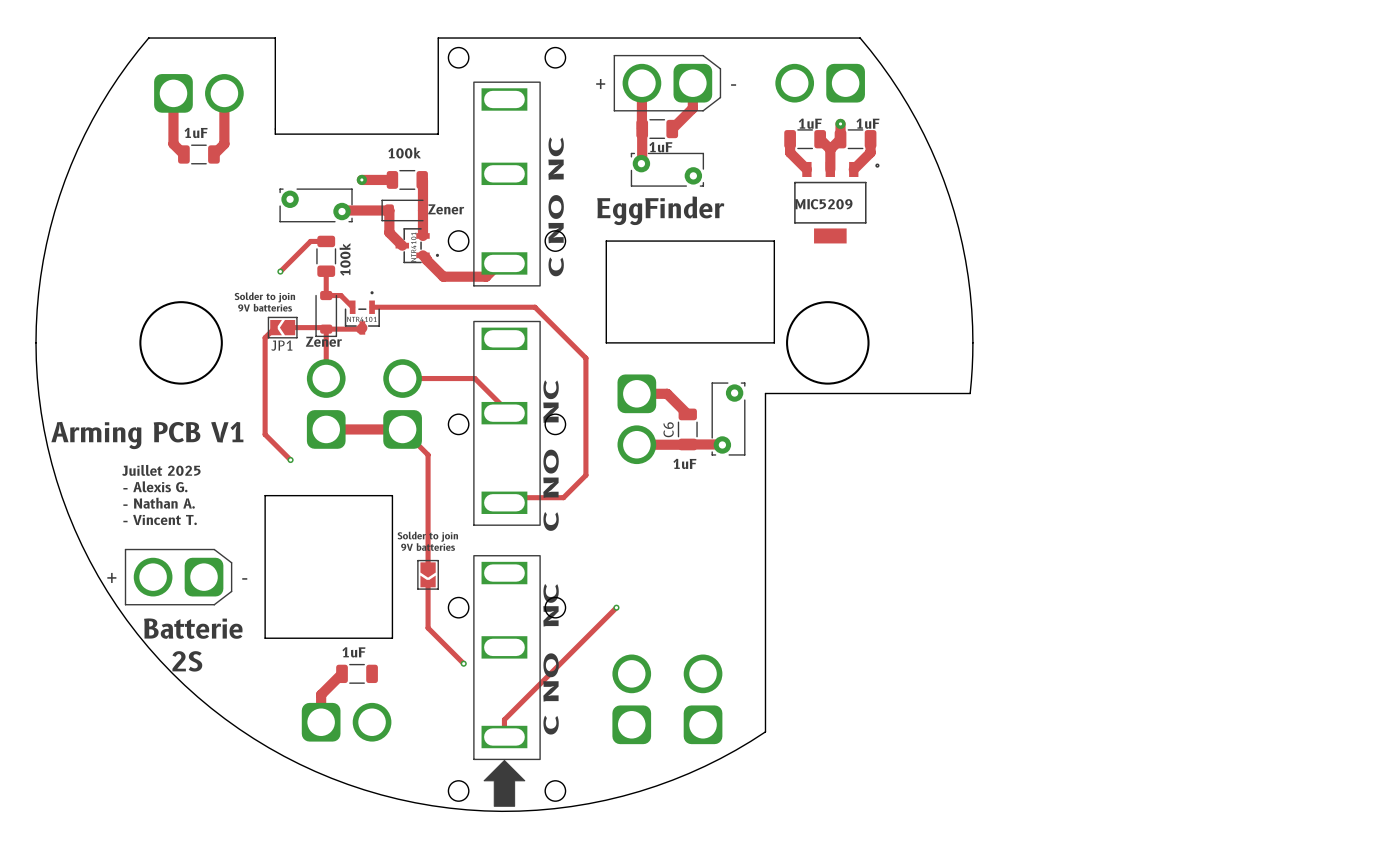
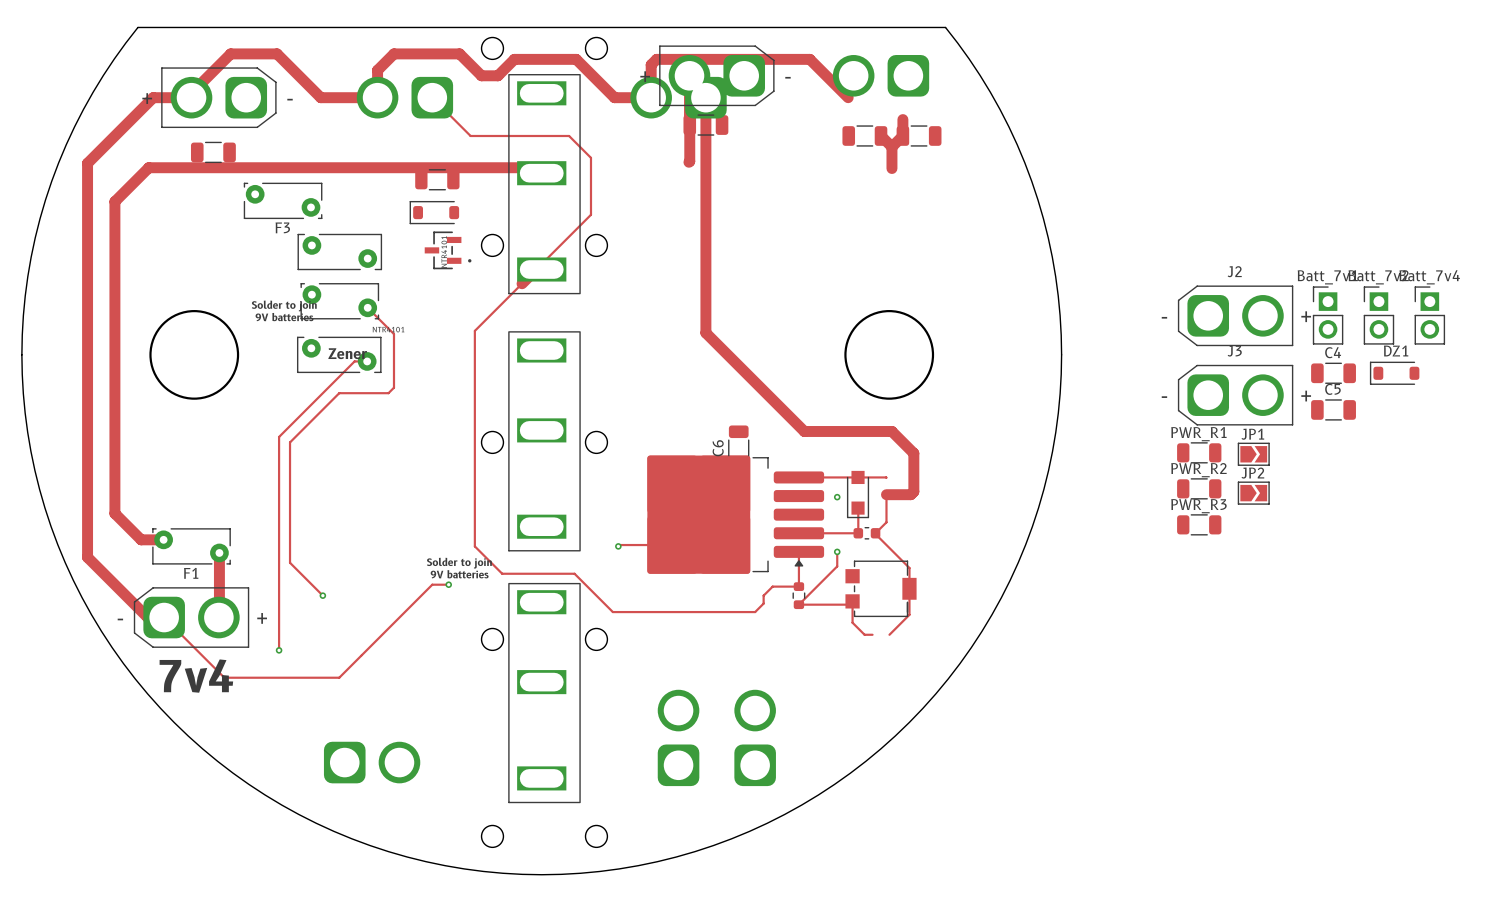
board edge: (148, 38) (275, 38) (275, 134) (438, 134) (438, 38) (860, 38) (890, 77) (916, 119) (937, 164) (954, 211) (965, 260) (971, 309) (972, 355) (970, 393) (765, 393) (765, 731) (720, 758) (688, 773) (656, 786) (605, 800) (554, 808) (519, 811) (449, 808) (415, 802) (364, 789) (331, 778) (284, 756) (239, 729) (211, 708) (184, 685) (148, 647) (116, 605) (98, 576) (82, 545) (62, 497) (47, 446) (41, 412) (35, 342) (37, 309) (43, 260) (54, 211) (65, 180) (84, 134) (100, 105) (118, 77) (148, 38) -> (137, 27) (103, 75) (83, 109) (66, 144) (45, 199) (31, 257) (25, 295) (21, 354) (25, 413) (30, 451) (44, 508) (65, 562) (82, 597) (112, 647) (135, 679) (174, 722) (217, 761) (265, 795) (298, 814) (351, 838) (407, 857) (445, 865) (502, 873) (541, 874) (599, 871) (638, 865) (694, 851) (749, 831) (801, 805) (850, 773) (880, 748) (922, 708) (948, 679) (991, 614) (1018, 562) (1032, 526) (1052, 451) (1060, 393) (1061, 354) (1058, 295) (1052, 257) (1031, 181) (999, 109) (980, 75) (945, 27) (137, 27)
track: (692, 83) (692, 108) (672, 129) -> none
part: (198, 93) -> none
track: (173, 103) (173, 144) (183, 154) -> none
part: none -> (218, 97)
track: (224, 103) (224, 144) (213, 154) -> none
part: none -> (404, 97)
track: none -> (432, 97) (470, 135) (569, 135) (590, 157) (590, 214) (541, 264)
part: none -> (678, 97)
track: none -> (705, 97) (705, 332) (804, 431) (891, 431) (913, 453) (913, 491) (910, 494) (886, 494)
track: none -> (848, 97) (809, 59) (656, 59) (651, 64) (651, 97) (614, 97) (576, 59) (514, 59) (497, 75) (481, 75) (459, 53) (393, 53) (377, 70) (377, 97) (320, 97) (277, 53) (230, 53) (191, 93) (191, 97) (153, 97) (87, 163) (87, 557) (147, 617) (164, 617) (224, 677) (339, 677) (432, 584) (448, 584)
text: 1uF (810, 123) -> none
via: (840, 123) -> none
text: 1uF (867, 123) -> none
text: 1uF (196, 132) -> none
track: (790, 139) (790, 152) (806, 169) -> none
track: (870, 139) (870, 152) (853, 169) -> none
text: 1uF (660, 147) -> none
text: 100k (404, 152) -> none
track: none -> (541, 167) (148, 167) (114, 201) (114, 513) (141, 539) (163, 539)
part: (667, 169) -> none
track: (361, 179) (392, 179) -> none
via: (361, 179) -> none
track: (422, 179) (422, 235) -> none
F3: none -> (283, 200)
part: (836, 202) -> none
text: MIC5209 (823, 204) -> none
part position: (316, 205) -> (339, 301)
text: C NO NC (556, 206) -> none
text: Zener (446, 209) -> none
text: EggFinder (660, 210) -> none
track: (342, 211) (389, 210) (389, 232) (402, 245) -> none
track: (326, 241) (310, 241) (280, 271) -> none
board edge: (606, 241) (774, 241) (774, 342) (606, 342) (606, 241) -> none
part: none -> (339, 252)
track: (422, 255) (443, 276) (486, 276) -> (798, 551) (798, 586) (772, 586) (763, 595) (763, 603) (755, 612) (612, 612) (574, 573) (502, 573) (474, 546) (474, 330) (522, 283)
part: (326, 256) -> none
text: 100k (345, 259) -> none
via: (280, 271) -> none
track: (326, 271) (326, 295) (340, 295) (352, 307) -> none
track: none -> (367, 307) (393, 334) (393, 387) (388, 393) (339, 393) (290, 442) (290, 562) (322, 595)
J2: none -> (1235, 315)
Batt_7v1: none -> (1328, 315)
Batt_7v2: none -> (1378, 315)
Batt_7v4: none -> (1429, 315)
track: (372, 307) (535, 307) (585, 358) (585, 475) (563, 497) (504, 497) -> none
part: (362, 312) -> none
part: (326, 313) -> none
track: (275, 327) (265, 337) (265, 434) (290, 460) -> none
JP1 rotation: 0° (282, 327) -> 180° (1253, 454)
JP1 position: (282, 327) -> (1253, 454)
track: (290, 327) (326, 329) -> none
track: (362, 327) (326, 329) -> none
track: (326, 329) (326, 378) -> none
part: none -> (339, 354)
track: none -> (367, 361) (354, 361) (279, 436) (279, 650)
C4: none -> (1333, 373)
DZ1: none -> (1394, 373)
track: (402, 378) (474, 378) (504, 408) -> none
J3: none -> (1235, 395)
track: (636, 393) (667, 393) (687, 414) -> none
C5: none -> (1333, 409)
part: (326, 403) -> none
part: (402, 403) -> none
part: (636, 419) -> none
part: (728, 419) -> none
track: (326, 429) (402, 429) (428, 454) (428, 567) -> none
PWR_R1: none -> (1199, 452)
text: Arming PCB V1 (147, 435) -> none
track: (636, 444) (722, 444) -> none
text: C NO NC (551, 455) -> none
track: none -> (809, 477) (886, 477)
via: (290, 460) -> none
text: 1uF (684, 463) -> none
PWR_R2: none -> (1199, 488)
text: Juillet 2025 (161, 470) -> none
JP2: none -> (1253, 493)
part: none -> (858, 494)
track: none -> (886, 494) (886, 522) (875, 534) (909, 568) (909, 614) (889, 634)
via: none -> (837, 497)
track: none -> (858, 508) (858, 533) (809, 533)
text: - Alexis G. (155, 486) -> none
part: none -> (735, 514)
board edge: (265, 495) (392, 495) (392, 638) (265, 638) (265, 495) -> none
PWR_R3: none -> (1199, 524)
text: - Nathan A. (159, 503) -> none
part: none -> (866, 533)
text: - Vincent T. (160, 519) -> none
track: none -> (672, 545) (618, 546)
F1: none -> (191, 546)
via: none -> (618, 546)
track: none -> (837, 551) (837, 566) (798, 604) (849, 604)
via: none -> (837, 551)
track: none -> (219, 552) (219, 616)
via: none -> (448, 584)
part: none -> (881, 588)
via: none -> (322, 595)
part: none -> (798, 595)
part: (428, 574) -> none
track: none -> (848, 605) (852, 601) (852, 622) (864, 634) (872, 634)
part rotation: 0° (178, 577) -> 180° (191, 617)
track: (428, 582) (428, 628) (463, 663) -> none
track: (616, 607) (504, 719) (504, 737) -> none
via: (616, 607) -> none
via: none -> (279, 650)
text: Batterie (193, 628) -> none
text: none -> 7v4 (196, 676)
text: 1uF (353, 652) -> none
text: C NO NC (551, 659) -> none
text: 2S (187, 661) -> none
via: (463, 663) -> none
track: (342, 673) (321, 694) (321, 722) -> none
part: (357, 673) -> none
drawing: [483, 759, 526, 807] -> none

